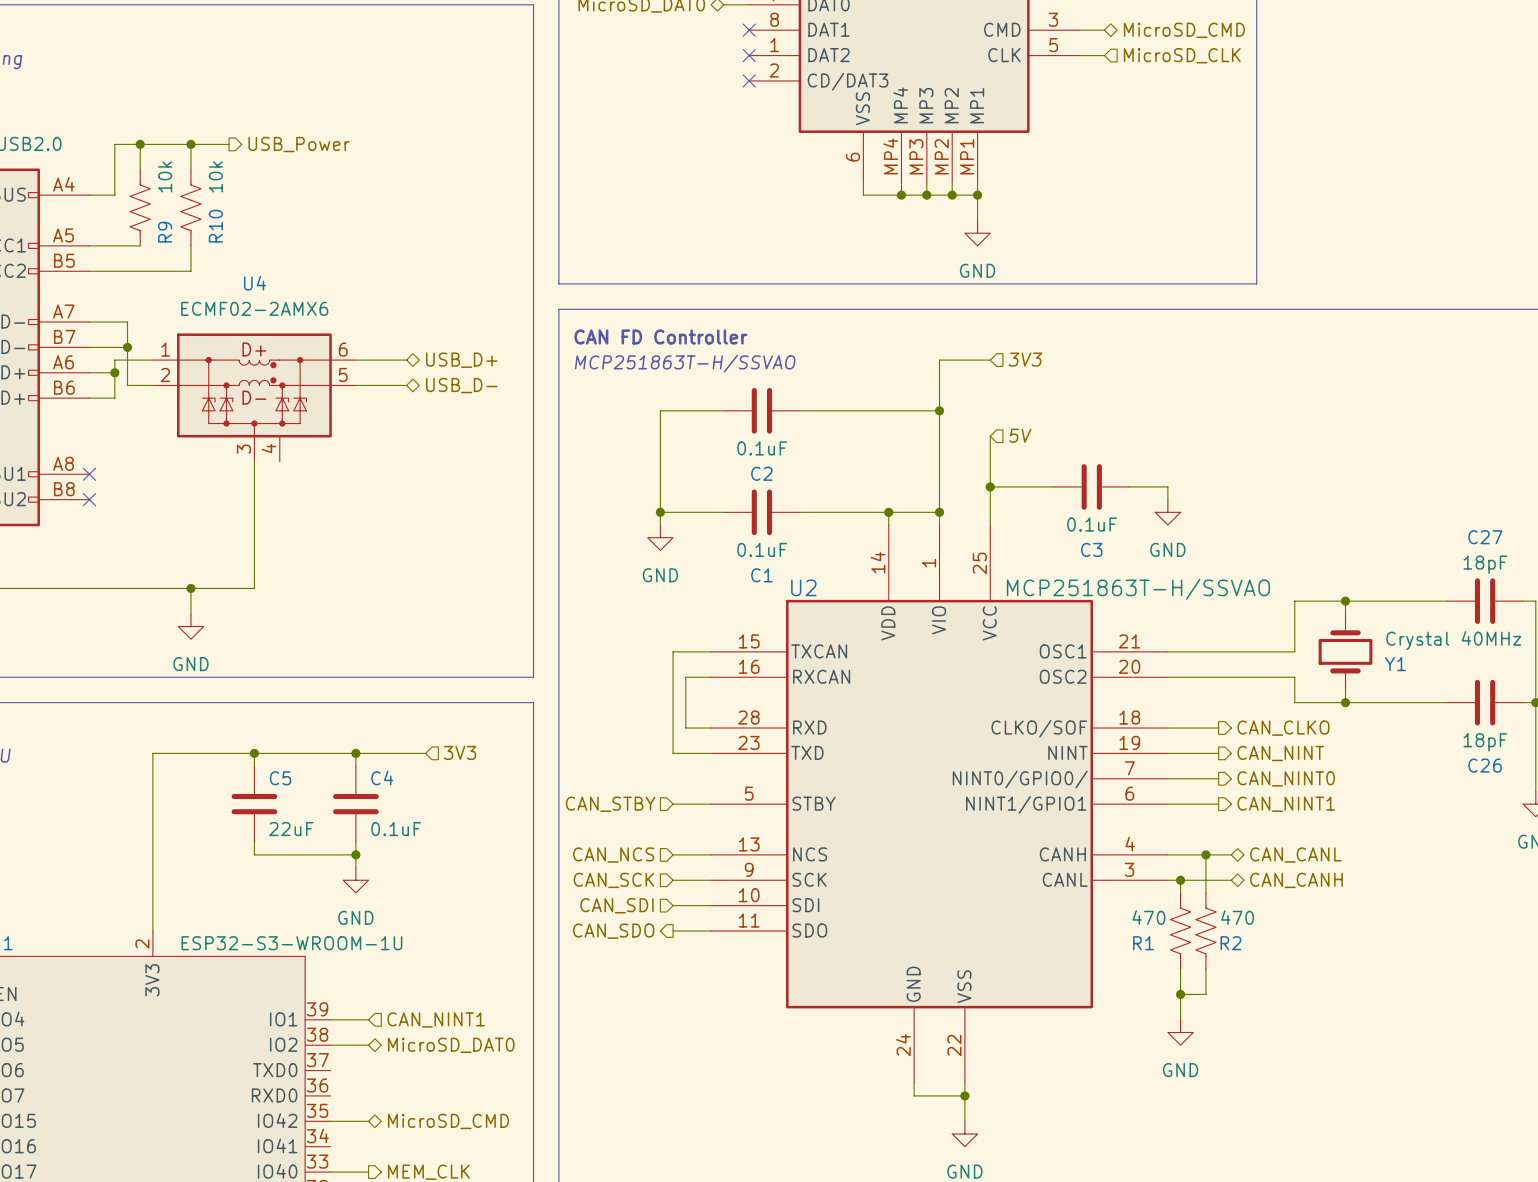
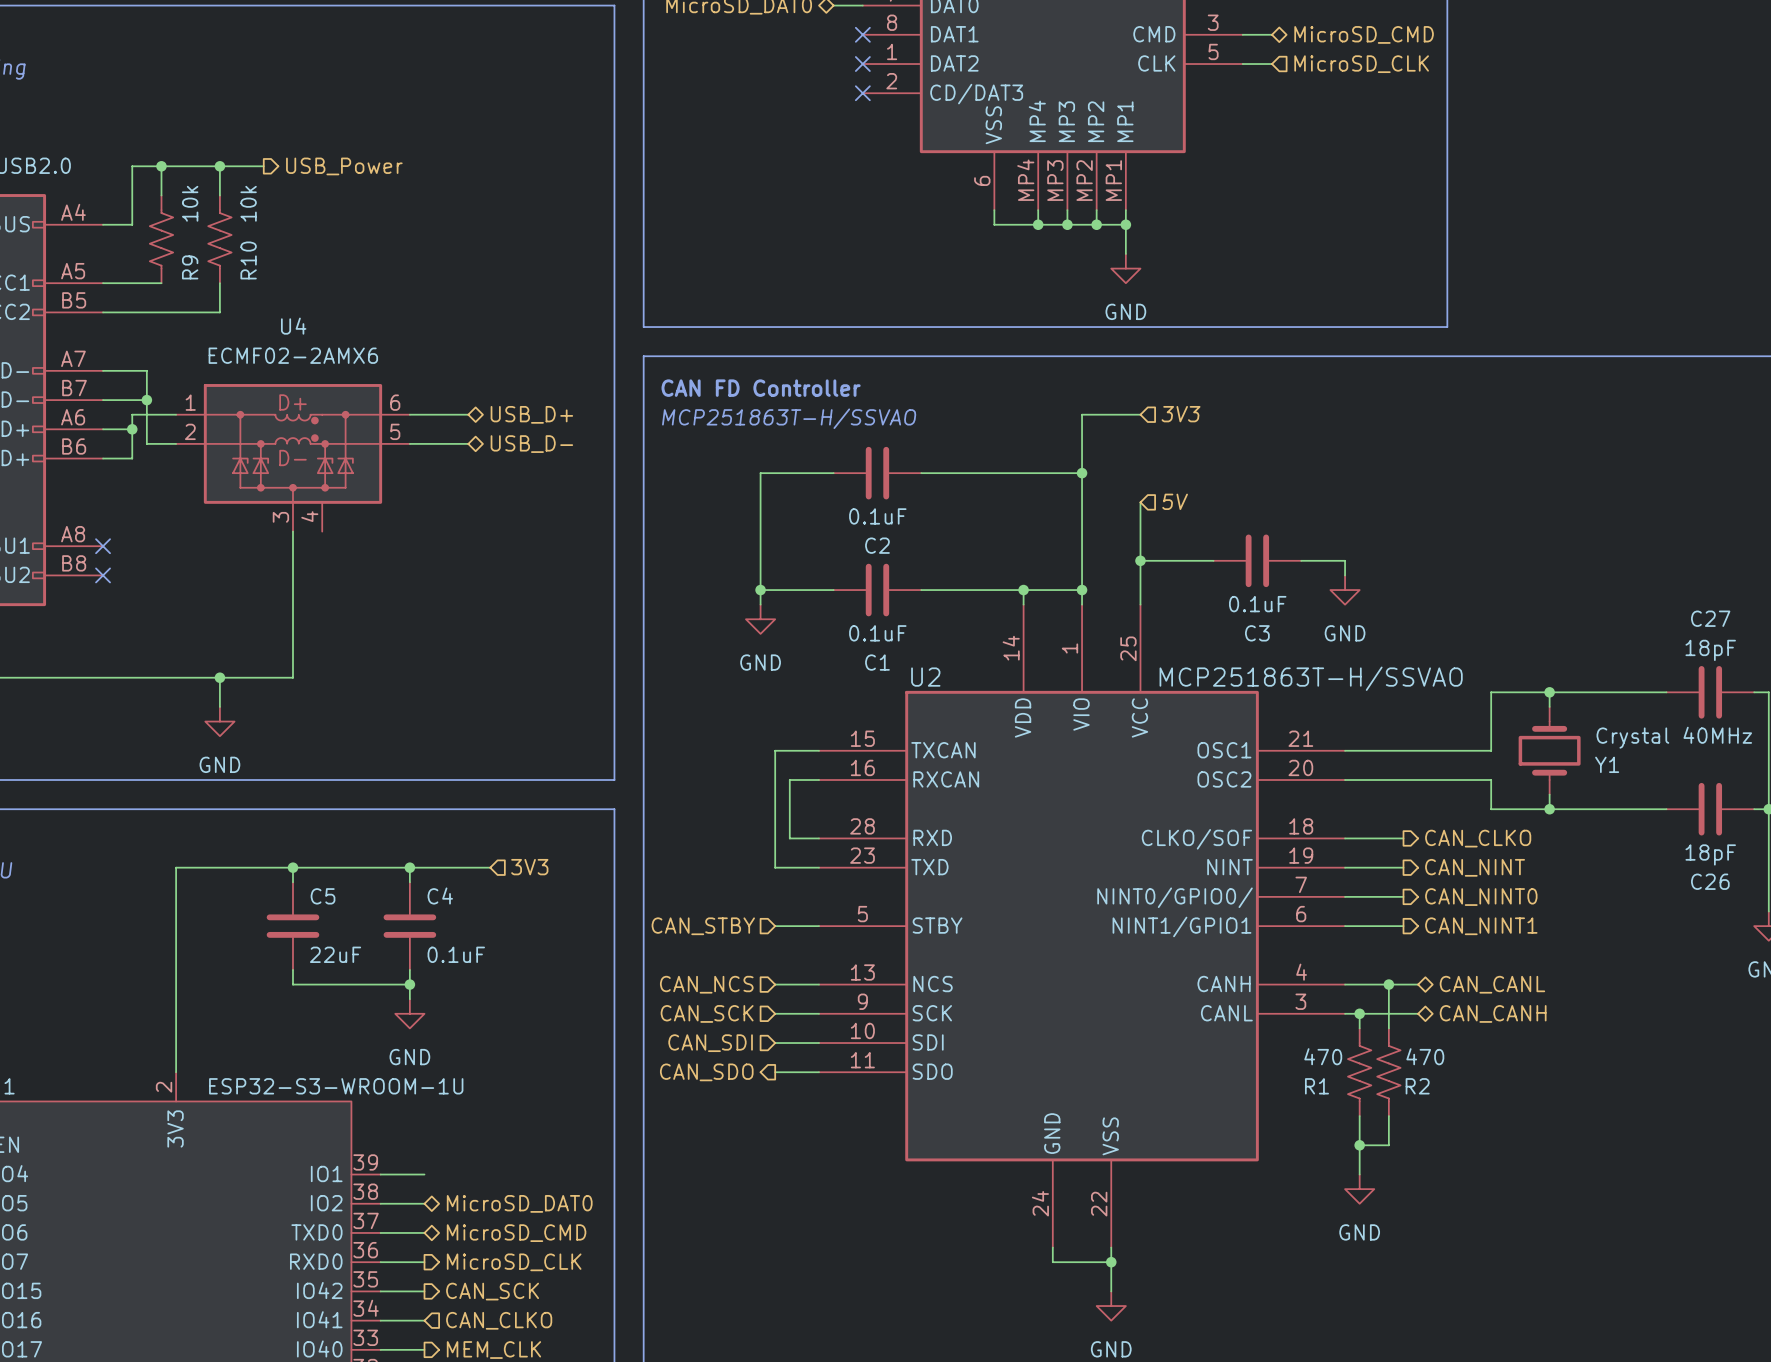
hierarchical label: CAN_NINT1 (436, 1019) -> none
wire: none -> (380, 1232) (424, 1232)
hierarchical label: none -> MicroSD_CMD (516, 1233)
wire: none -> (380, 1262) (424, 1262)
hierarchical label: none -> MicroSD_CLK (514, 1262)
hierarchical label shape: bidirectional (448, 1121) -> output (492, 1291)
hierarchical label: MicroSD_CMD (448, 1121) -> CAN_SCK (492, 1291)
wire: none -> (380, 1320) (424, 1320)
hierarchical label: none -> CAN_CLKO (499, 1320)

